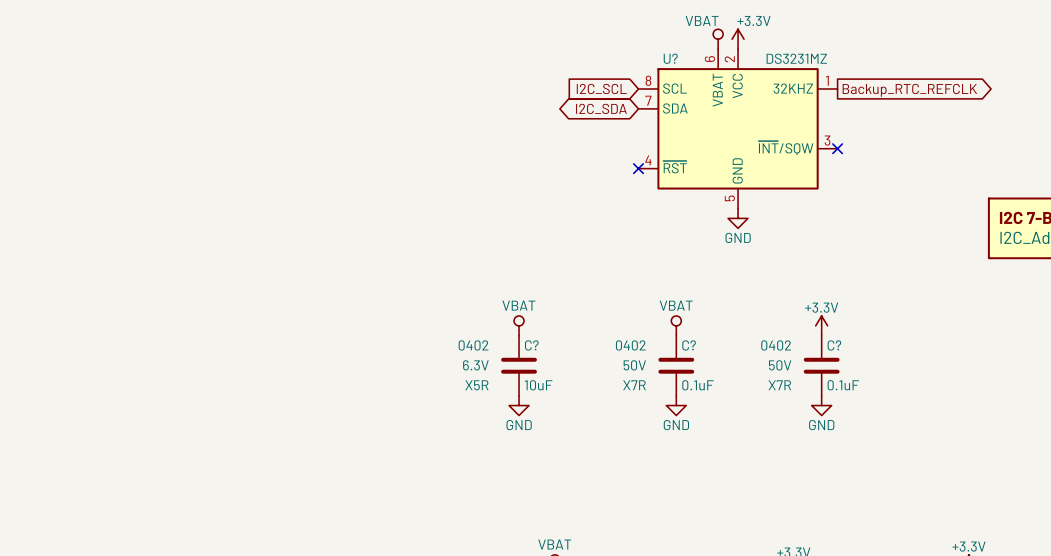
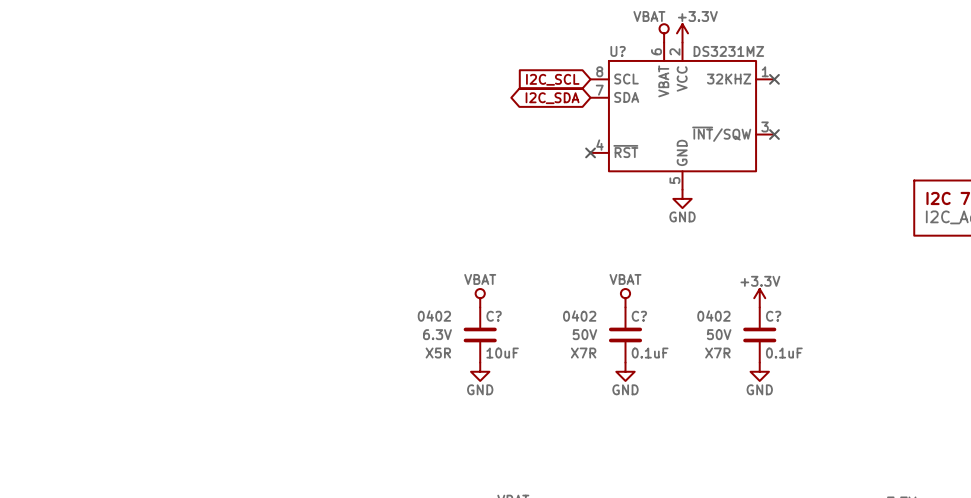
no-connect mark: none -> (774, 79)
global label: Backup_RTC_REFCLK (909, 90) -> none

